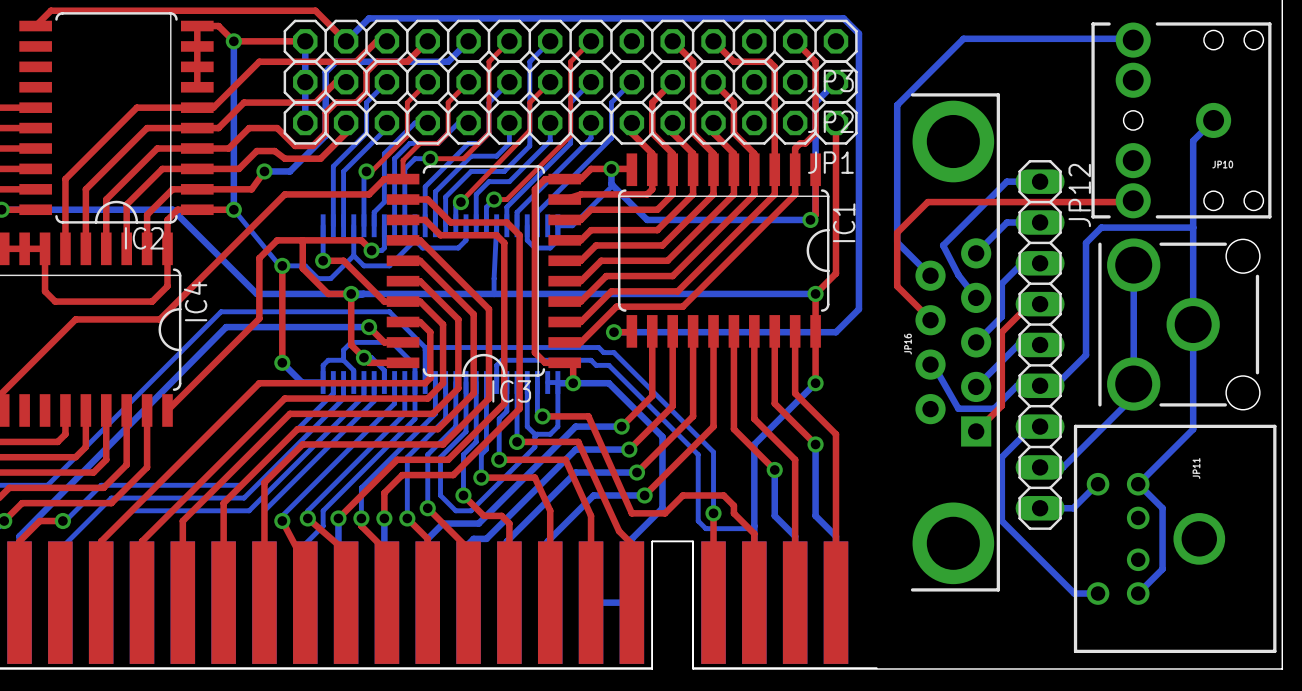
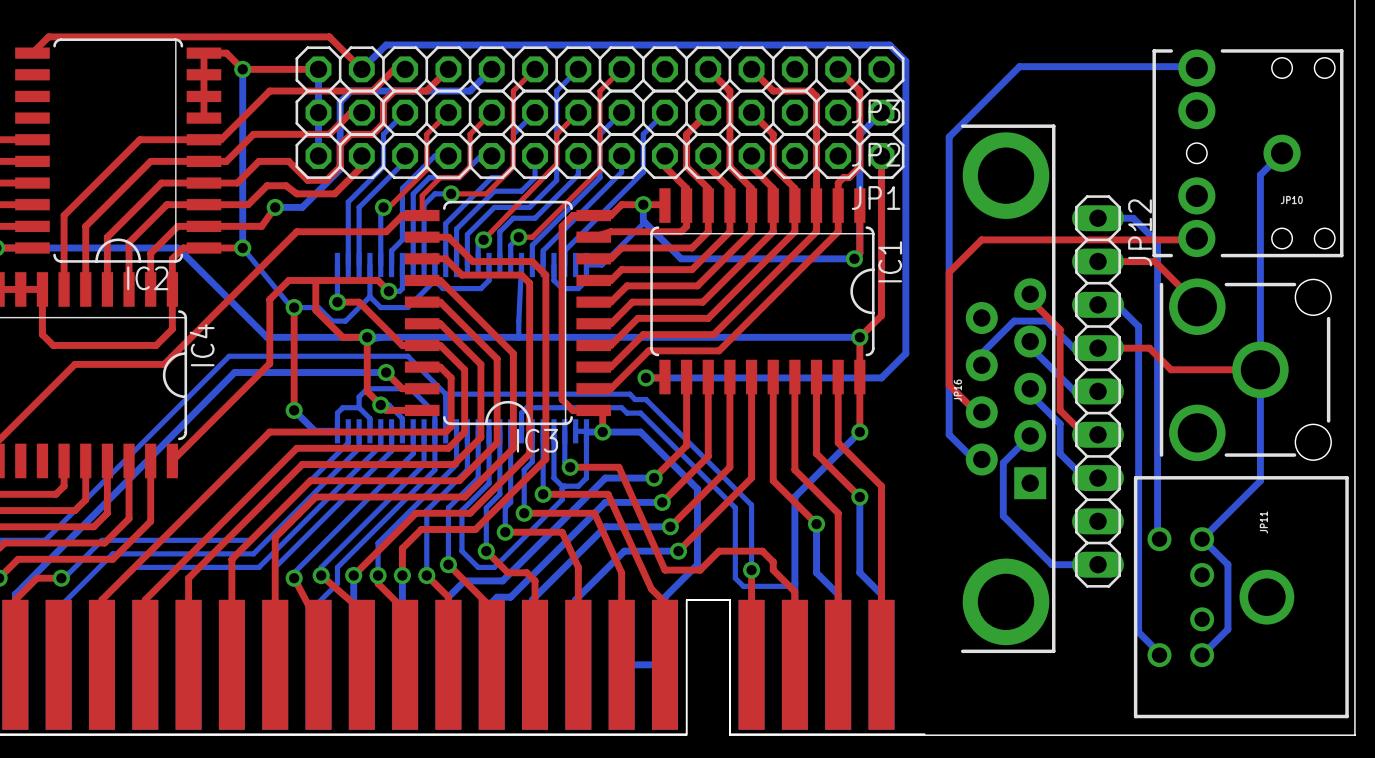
bottom track: (966, 38) (963, 38) (897, 105) (897, 242) (930, 275) -> (1019, 66) (949, 137) (949, 434) (976, 462) (979, 462)
bottom track: (1040, 181) (1006, 181) (943, 245) (958, 275) (976, 297) -> none
bottom track: none -> (1100, 218) (1133, 218) (1157, 242) (1157, 534) (1162, 539)
top track: (930, 202) (927, 202) (897, 232) (897, 286) (930, 320) -> (981, 239) (949, 272) (949, 385) (979, 414)
bottom track: (1040, 222) (1007, 222) (976, 253) -> none
top track: none -> (1100, 261) (1154, 261) (1200, 306)
bottom track: (1193, 227) (1101, 227) (1086, 242) (1086, 355) (1055, 385) (1017, 385) (994, 408) (958, 408) (938, 373) (930, 364) -> none
top track: none -> (1027, 297) (1060, 329) (1060, 410) (1084, 434) (1100, 434)
bottom track: (1040, 263) (1022, 263) (1001, 283) (1001, 316) (976, 342) -> none
bottom track: none -> (1100, 304) (1116, 304) (1138, 326) (1138, 632) (1162, 655)
bottom track: (1133, 265) (1133, 396) (1063, 467) (1042, 467) -> none
top track: (1040, 304) (1029, 304) (1001, 332) (1001, 405) (976, 431) -> none
top track: none -> (1100, 348) (1149, 348) (1171, 369) (1263, 369)
bottom track: none -> (1100, 348) (1073, 348) (1046, 321) (1014, 321) (979, 356) (979, 367)
bottom track: (1018, 344) (976, 386) -> (1074, 391) (1027, 344)
bottom track: none -> (1027, 438) (1003, 462) (1003, 515) (1052, 564) (1098, 564)
bottom track: (1032, 426) (1001, 457) (1001, 521) (1074, 593) (1098, 593) -> (1089, 478) (1084, 478) (1060, 453) (1060, 423) (1027, 391)
bottom track: (1098, 484) (1073, 508) (1042, 508) -> none

